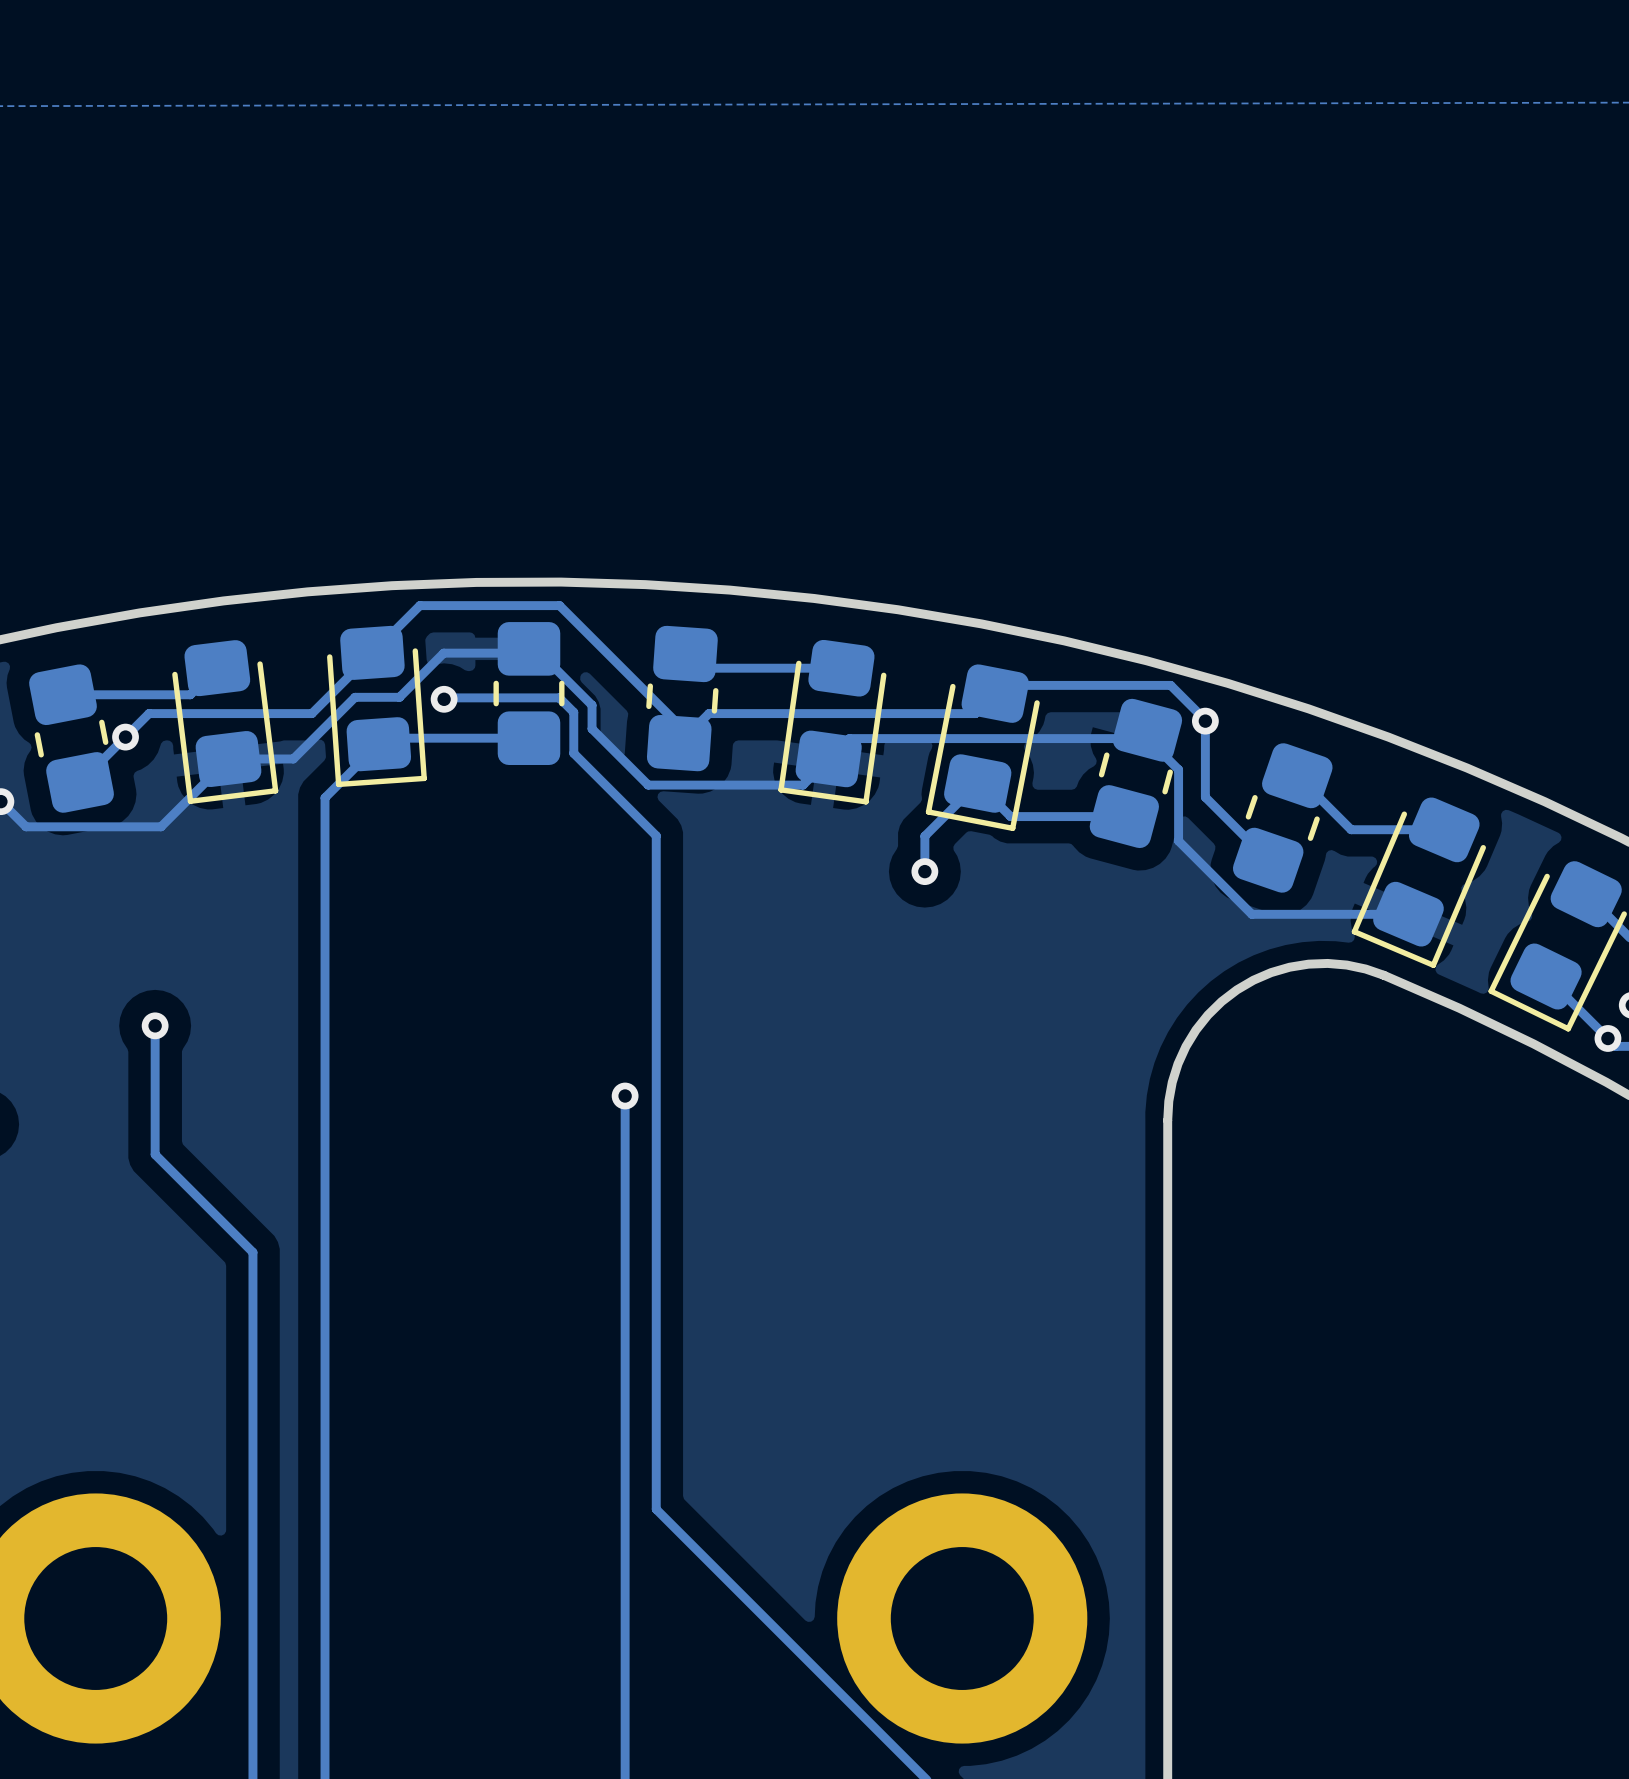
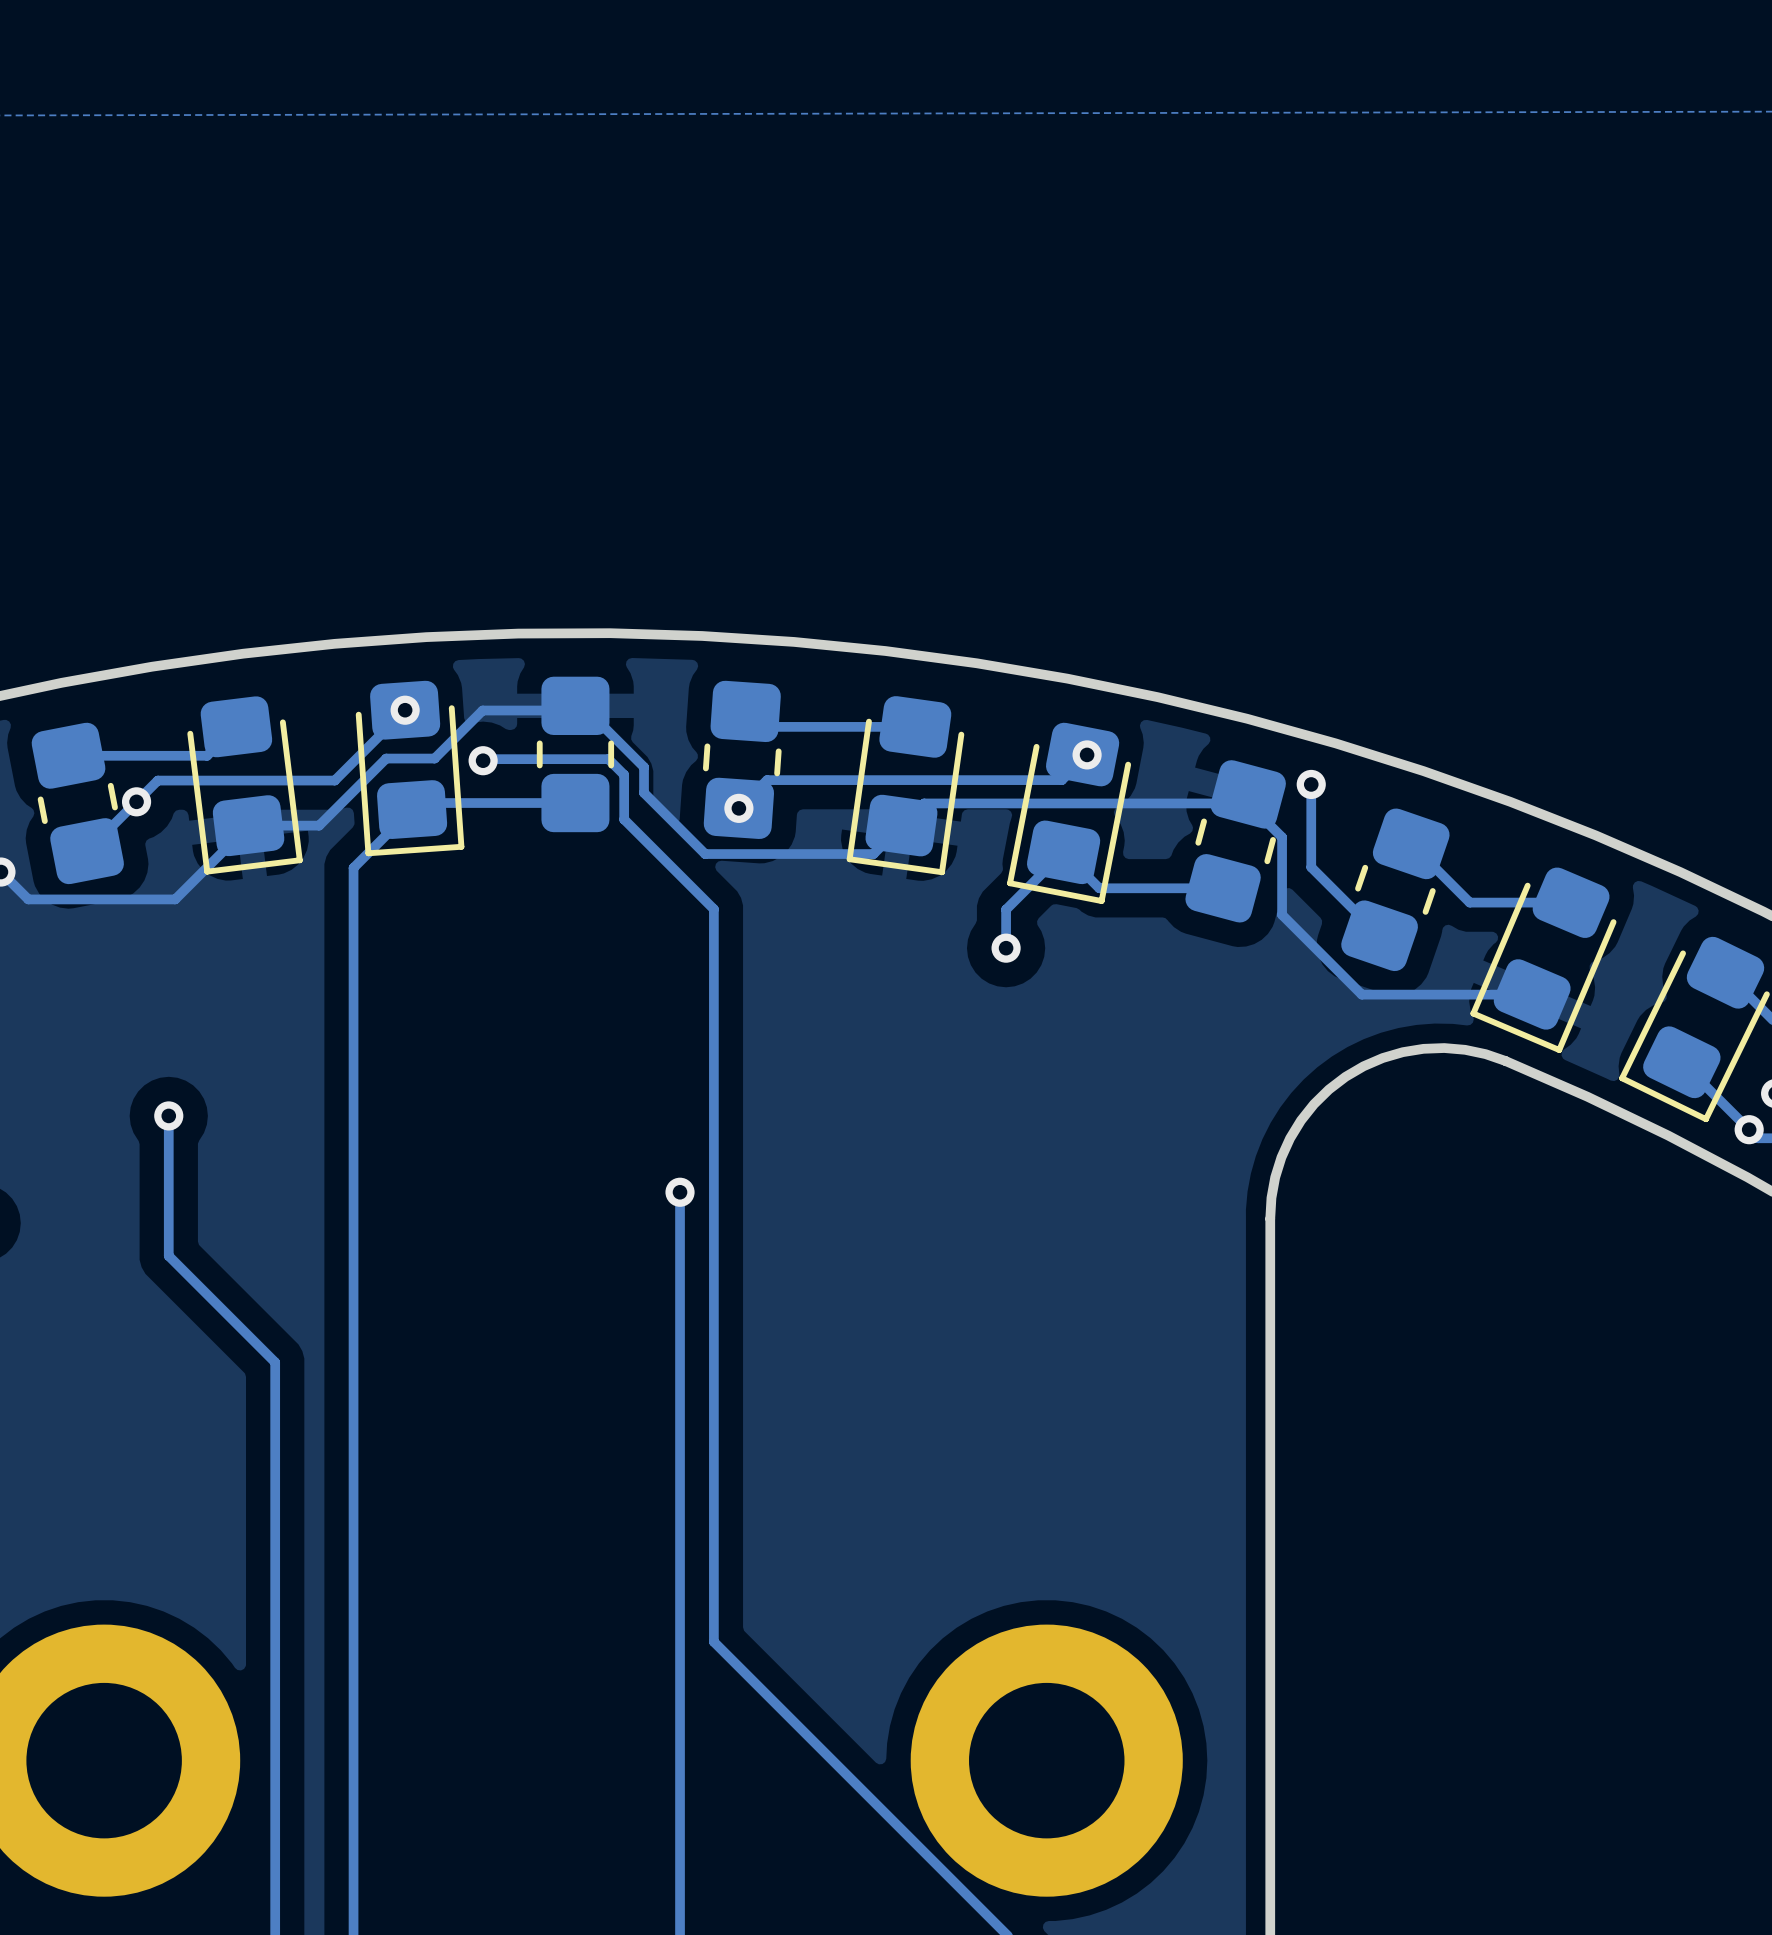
via: none -> (405, 710)
via: none -> (1087, 754)
track: (705, 717) (708, 713) (975, 713) (1003, 685) (1170, 685) (1205, 721) -> (767, 780) (1061, 780) (1087, 754)
track: (125, 737) (149, 713) (311, 713) (419, 605) (559, 605) (679, 725) (679, 743) -> (136, 801) (157, 780) (334, 780) (405, 710)
via: none -> (738, 808)

